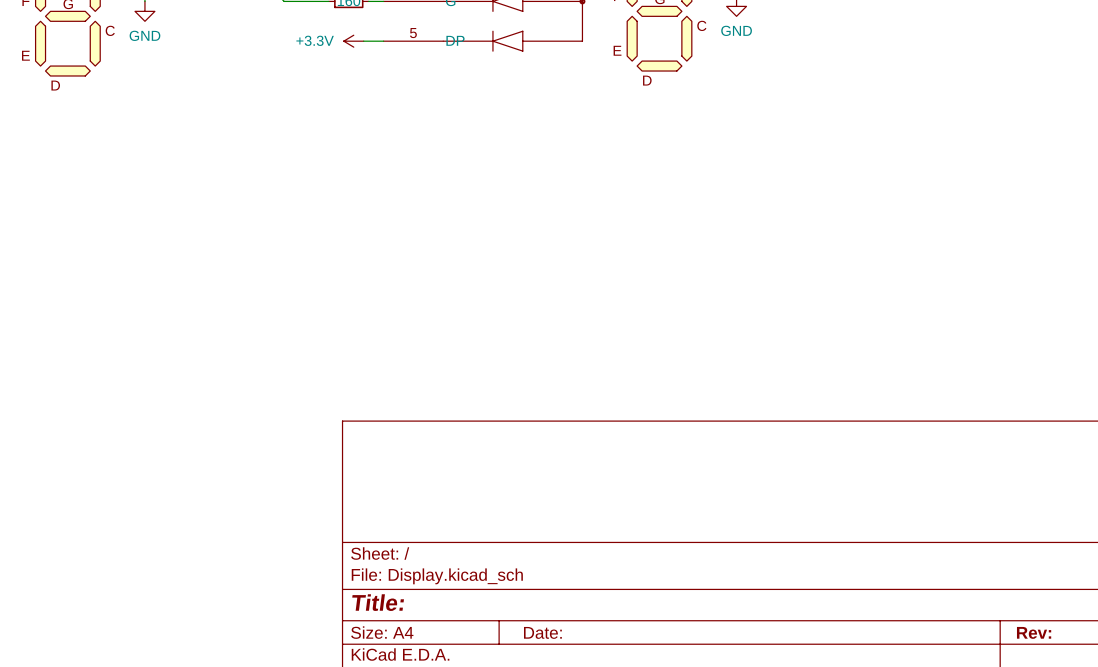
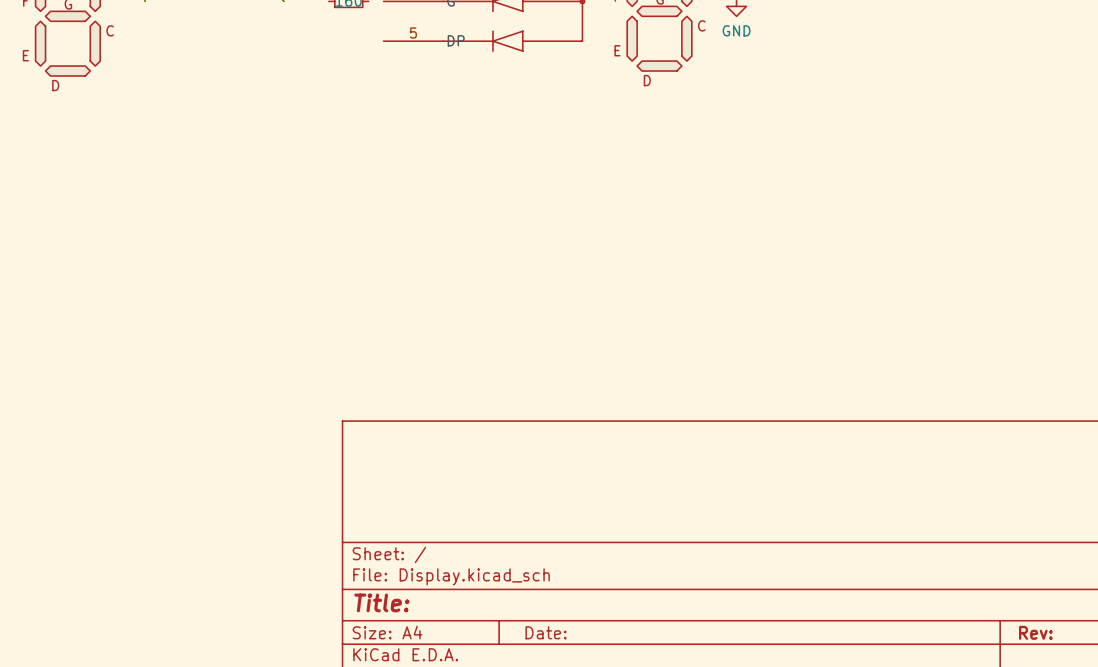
wire: (284, 1) (328, 1) -> none
wire: (368, 1) (383, 1) -> none
power symbol: GND (144, 11) -> none
power symbol: +3.3V (353, 41) -> none
wire: (363, 41) (383, 41) -> none

